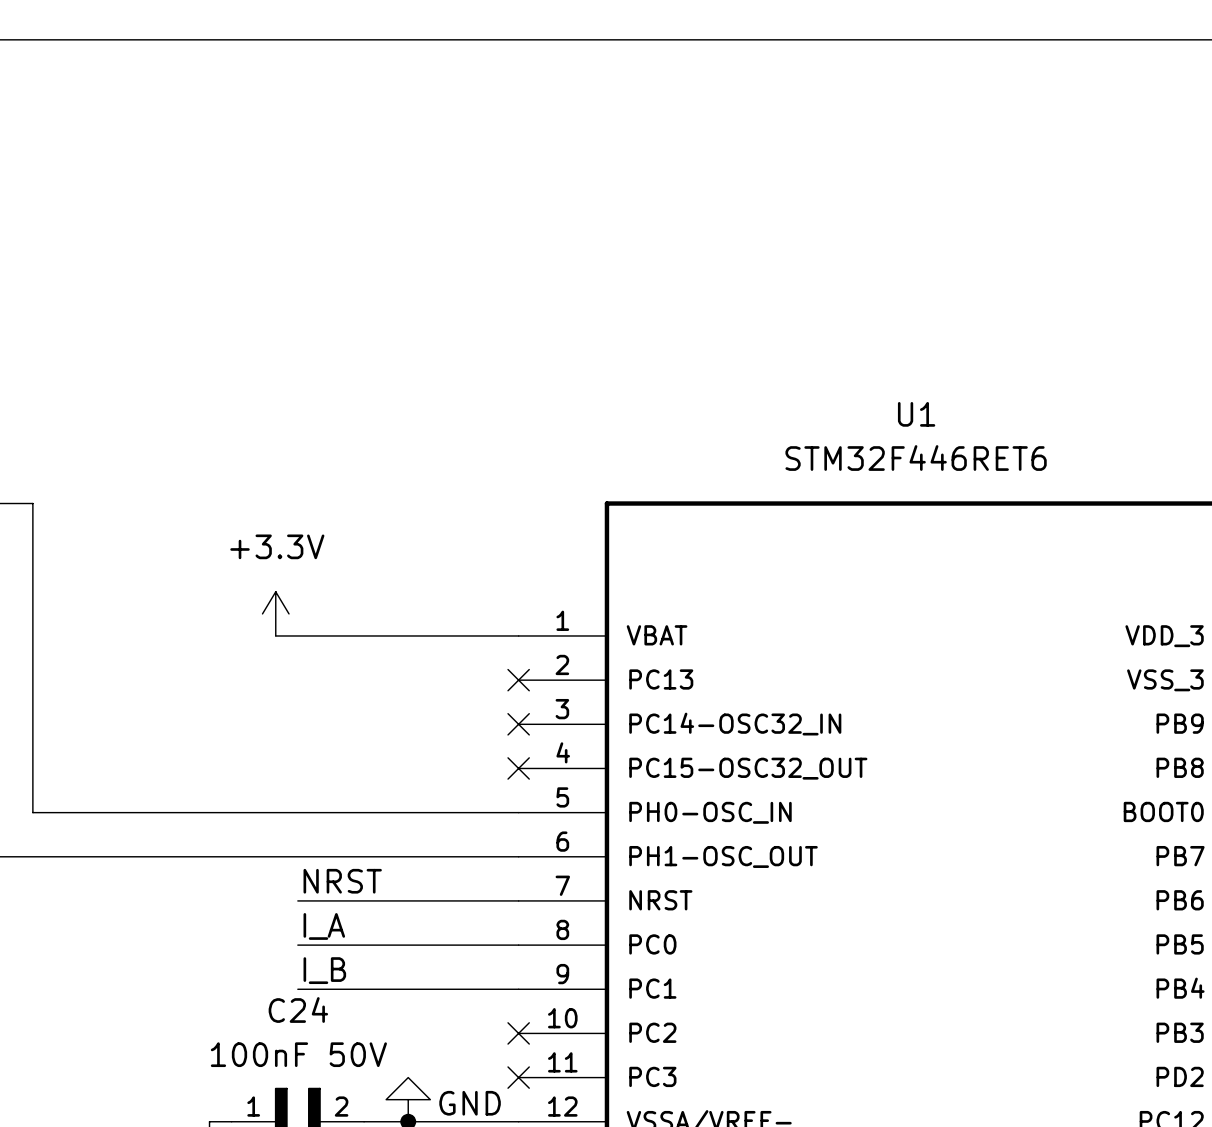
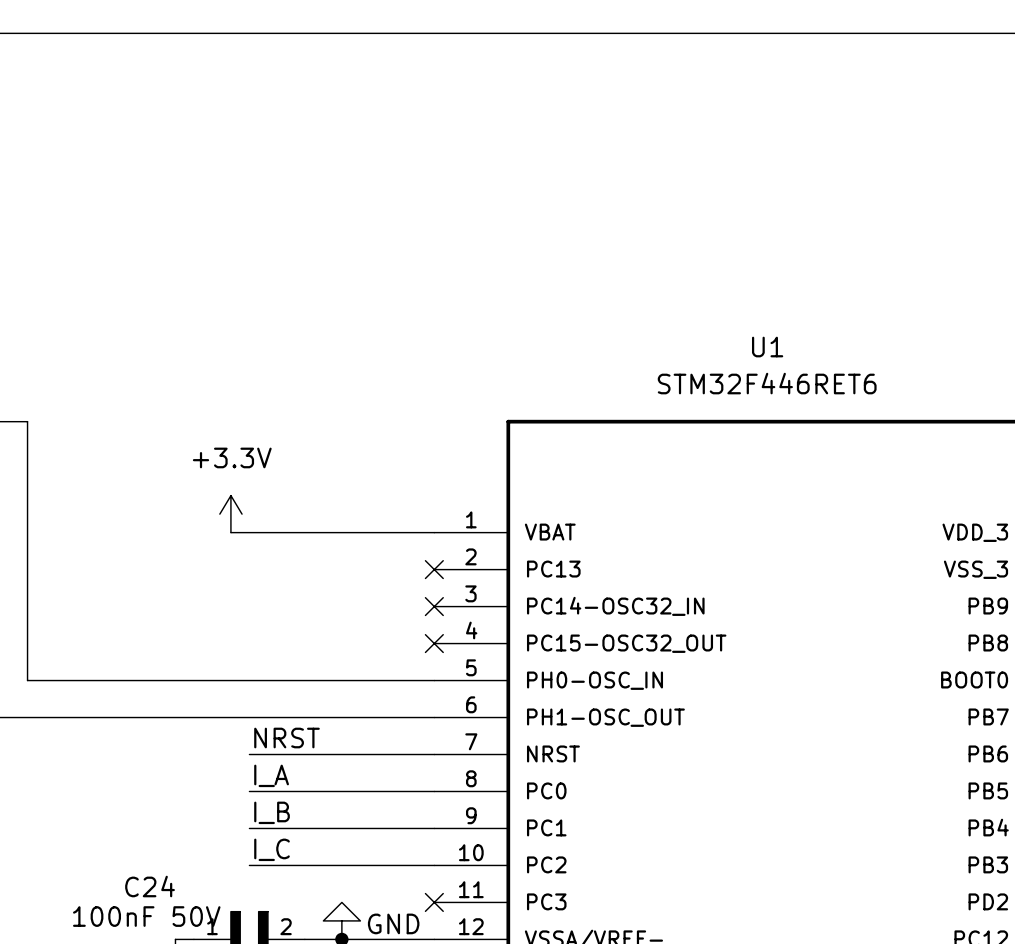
C24 name position: C24 (298, 1009) -> C24 (150, 886)
label: none -> I_C (272, 849)
wire: none -> (249, 865) (434, 865)
no-connect mark: (518, 1033) -> none
C24 value position: 100nF 50V (298, 1054) -> 100nF 50V (146, 916)

